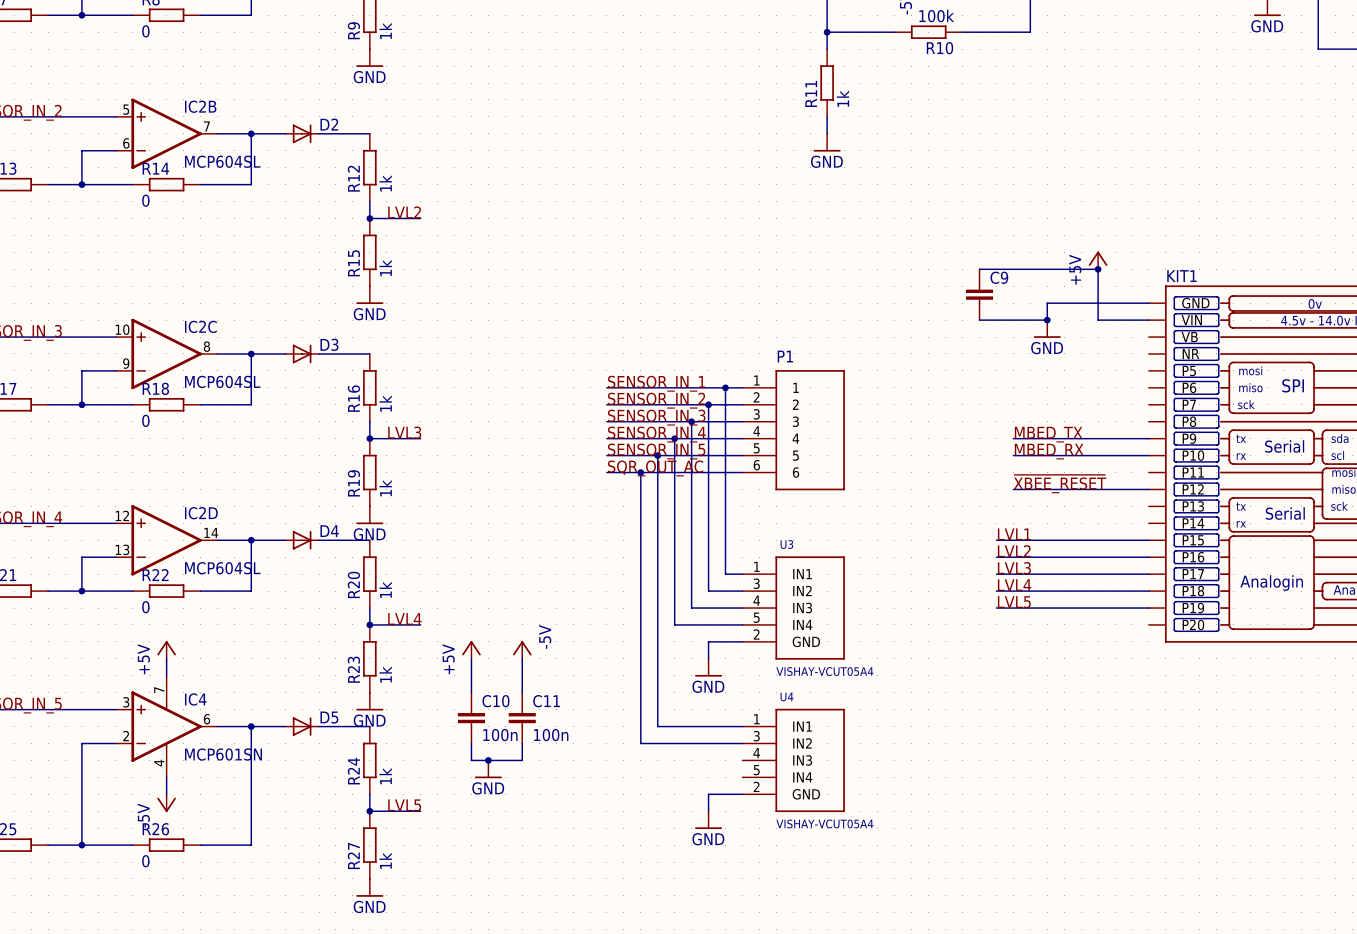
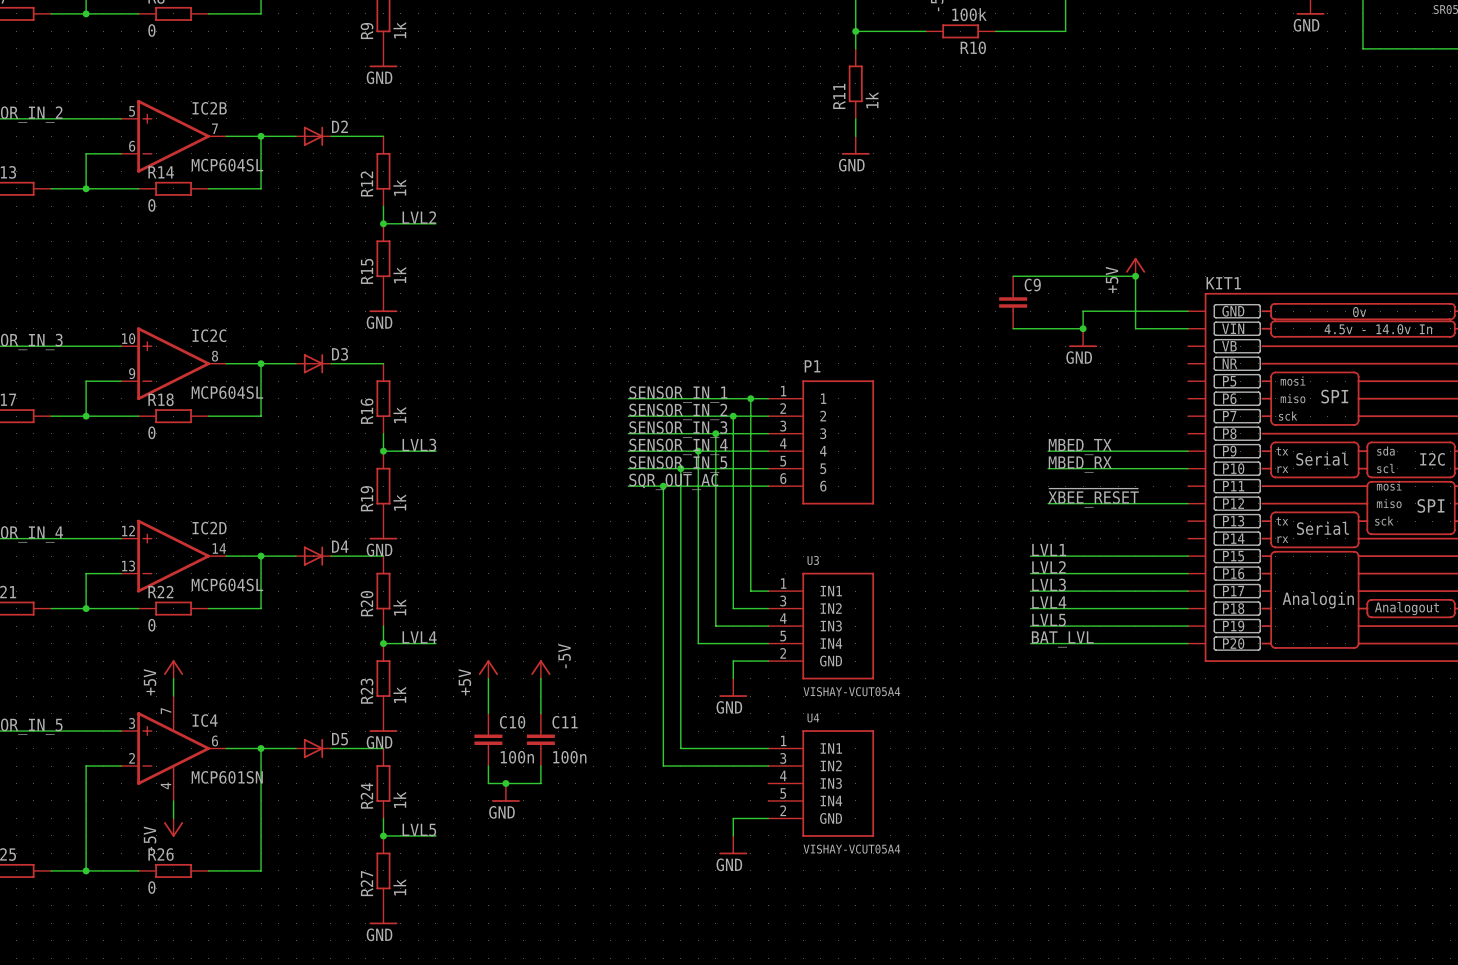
label: none -> BAT_LVL (1062, 639)
wire: none -> (1030, 643) (1188, 643)

